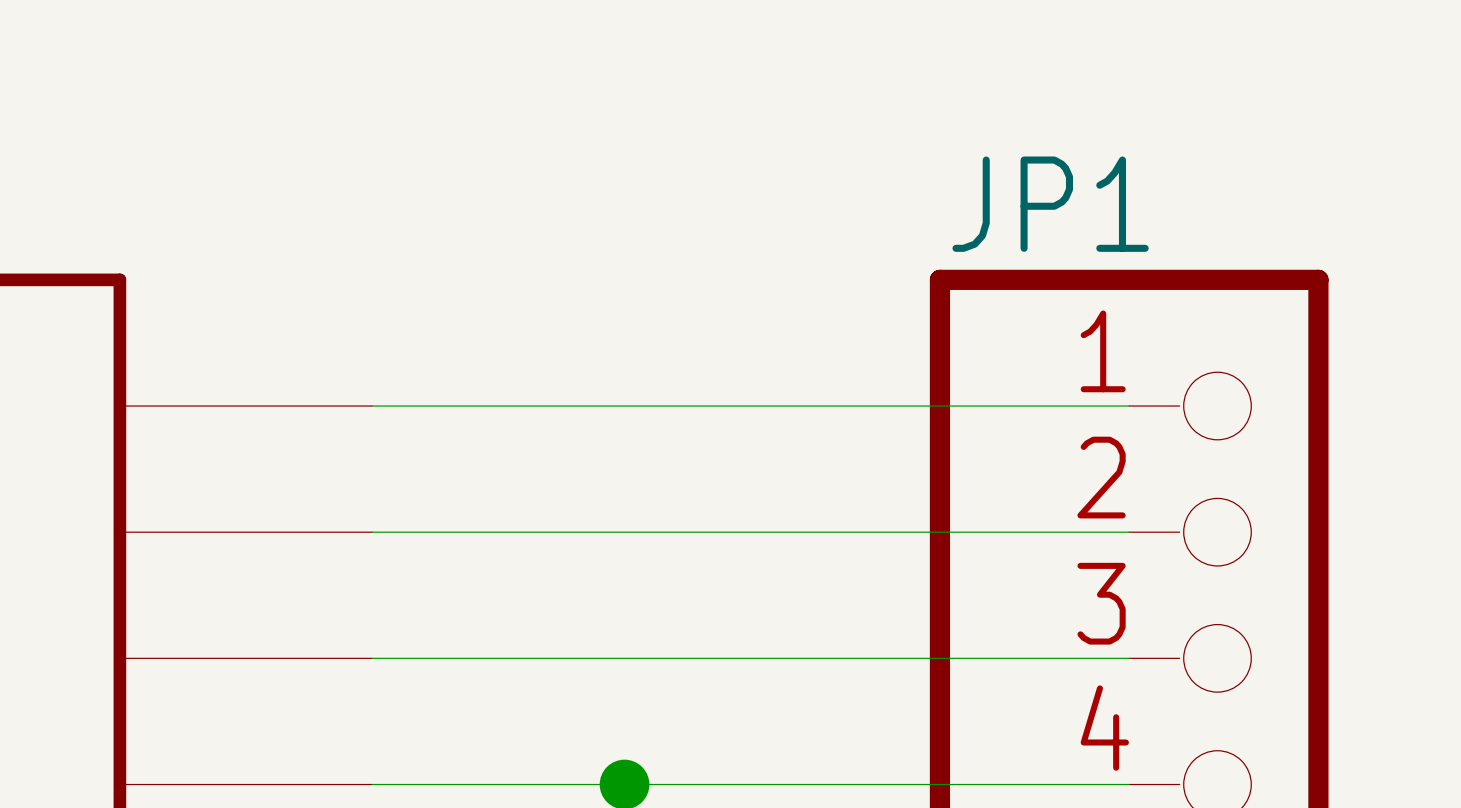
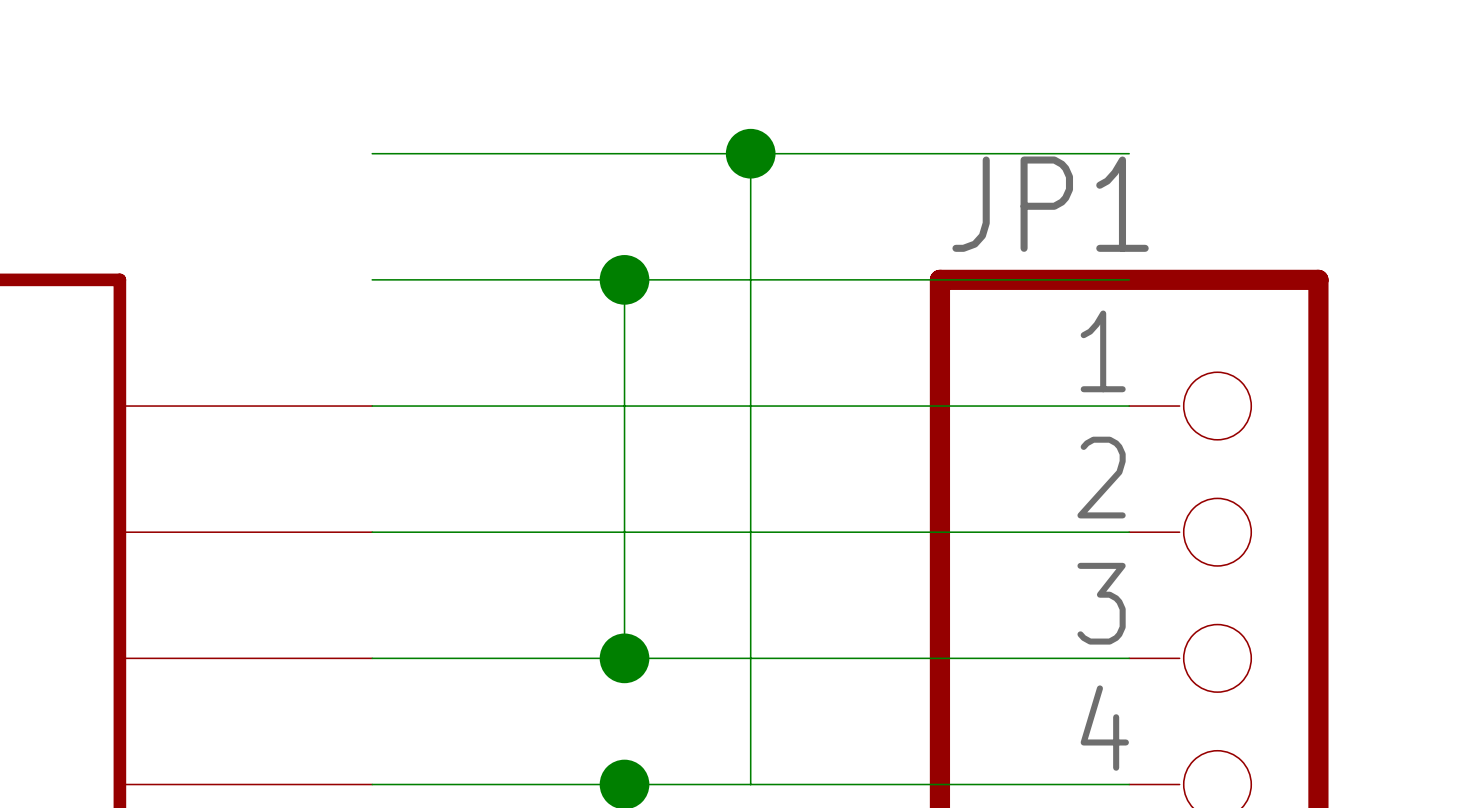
wire: none -> (372, 153) (1129, 153)
wire: none -> (750, 153) (750, 784)
junction: none -> (750, 153)
wire: none -> (372, 279) (1129, 279)
wire: none -> (624, 279) (624, 658)
junction: none -> (624, 279)
junction: none -> (624, 658)

